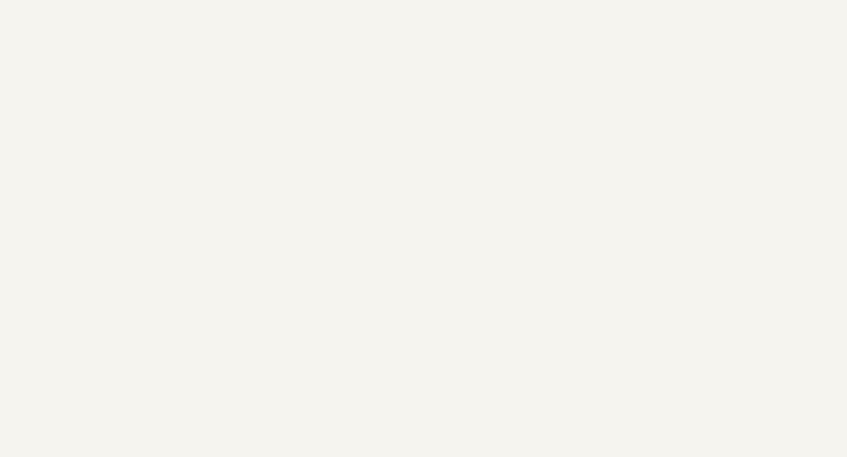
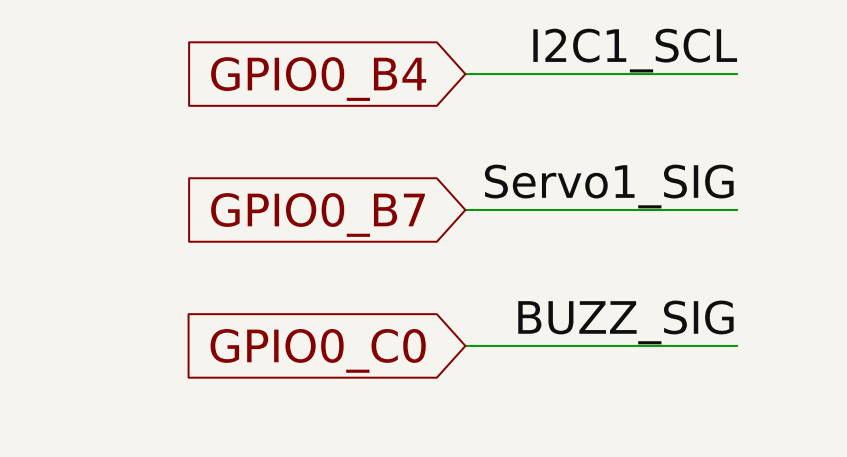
label: none -> I2C1_SCL (635, 50)
wire: none -> (465, 74) (737, 74)
global label: none -> GPIO0_B4 (318, 79)
label: none -> Servo1_SIG (609, 186)
wire: none -> (465, 209) (737, 209)
global label: none -> GPIO0_B7 (318, 214)
label: none -> BUZZ_SIG (625, 322)
wire: none -> (465, 345) (737, 345)
global label: none -> GPIO0_C0 (318, 350)

